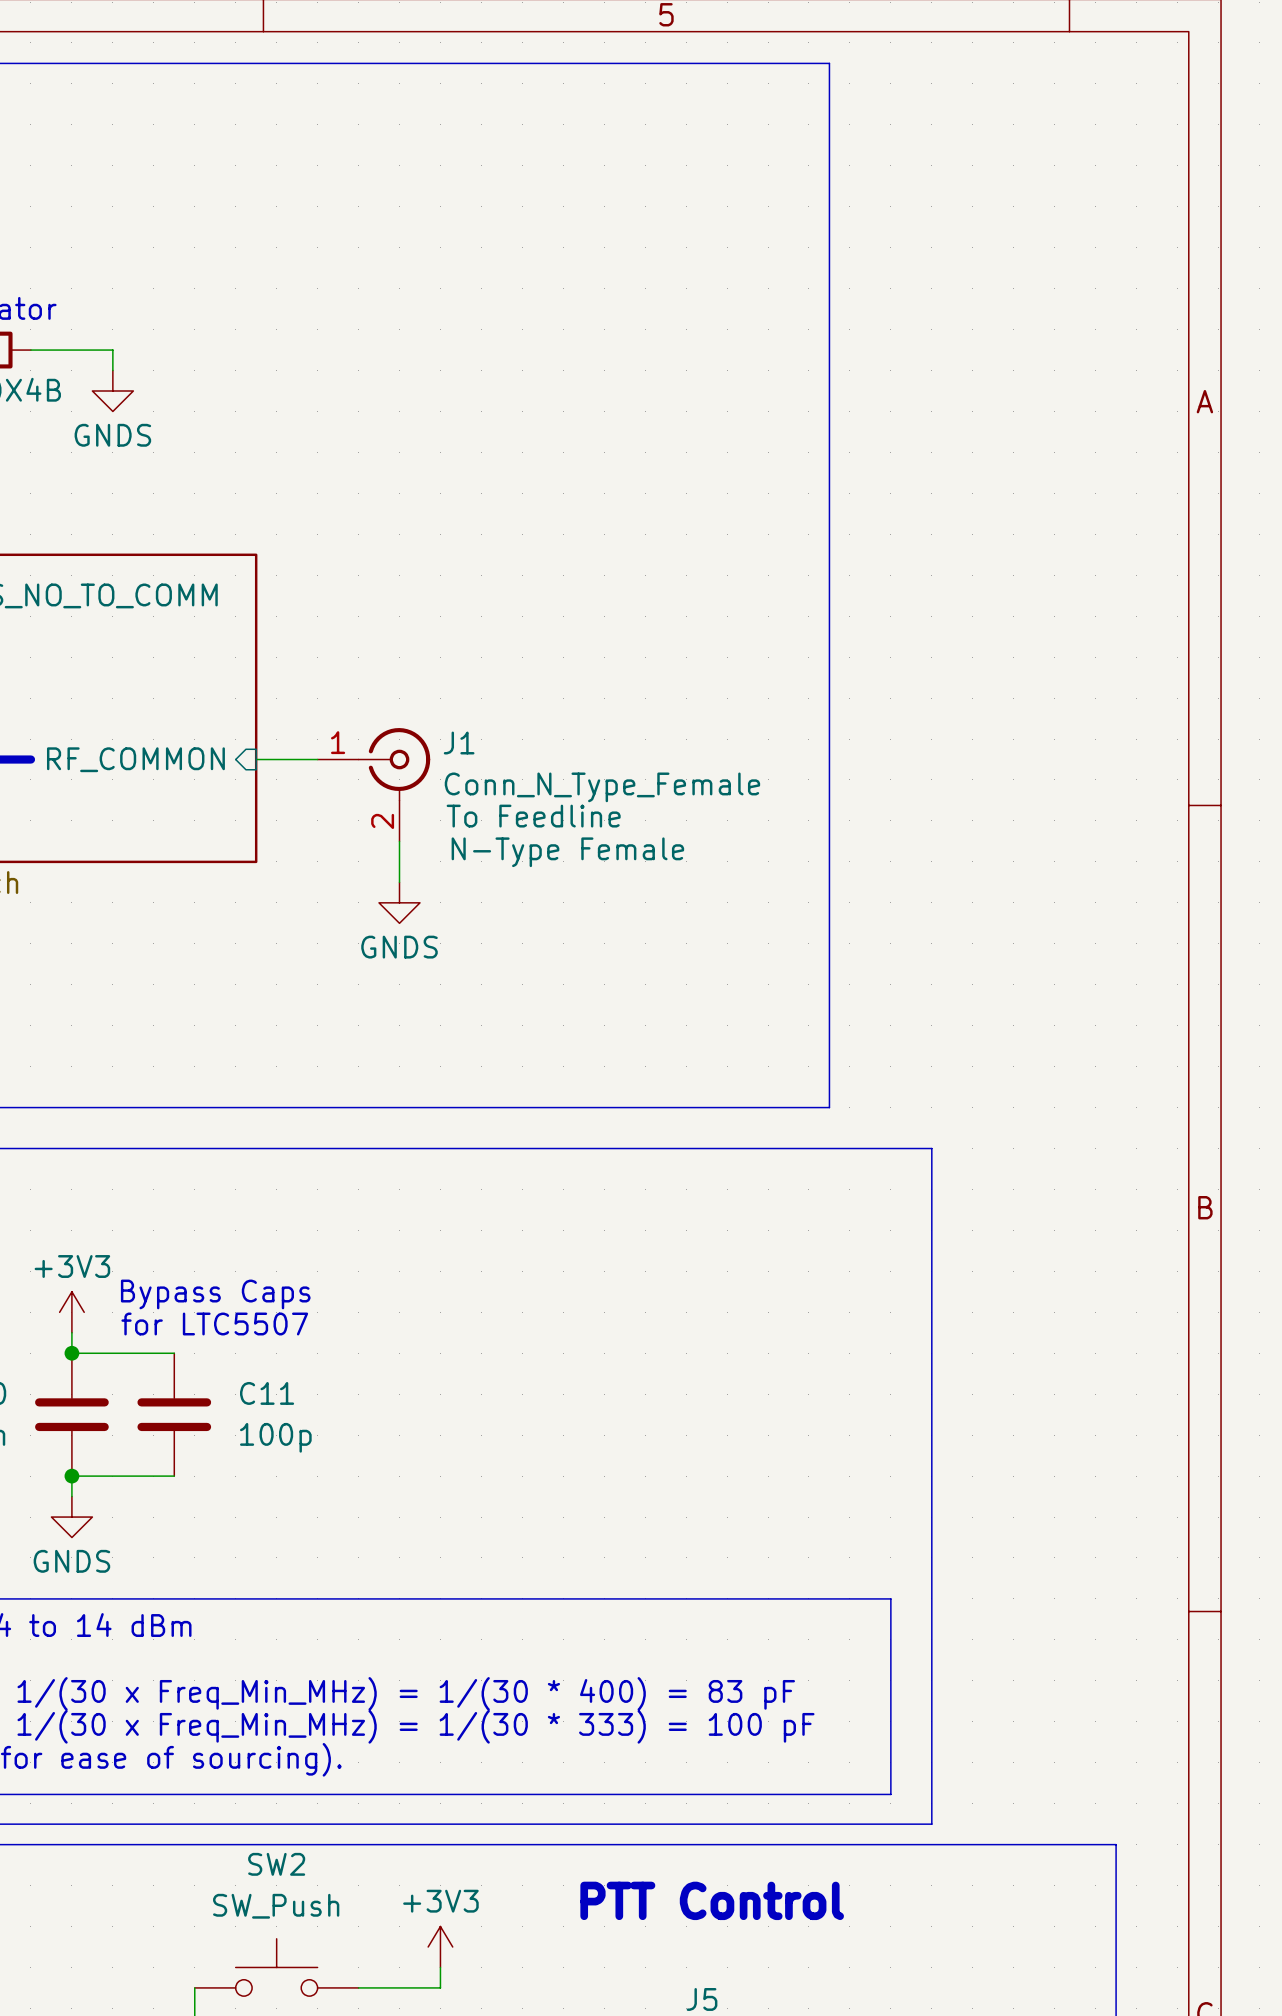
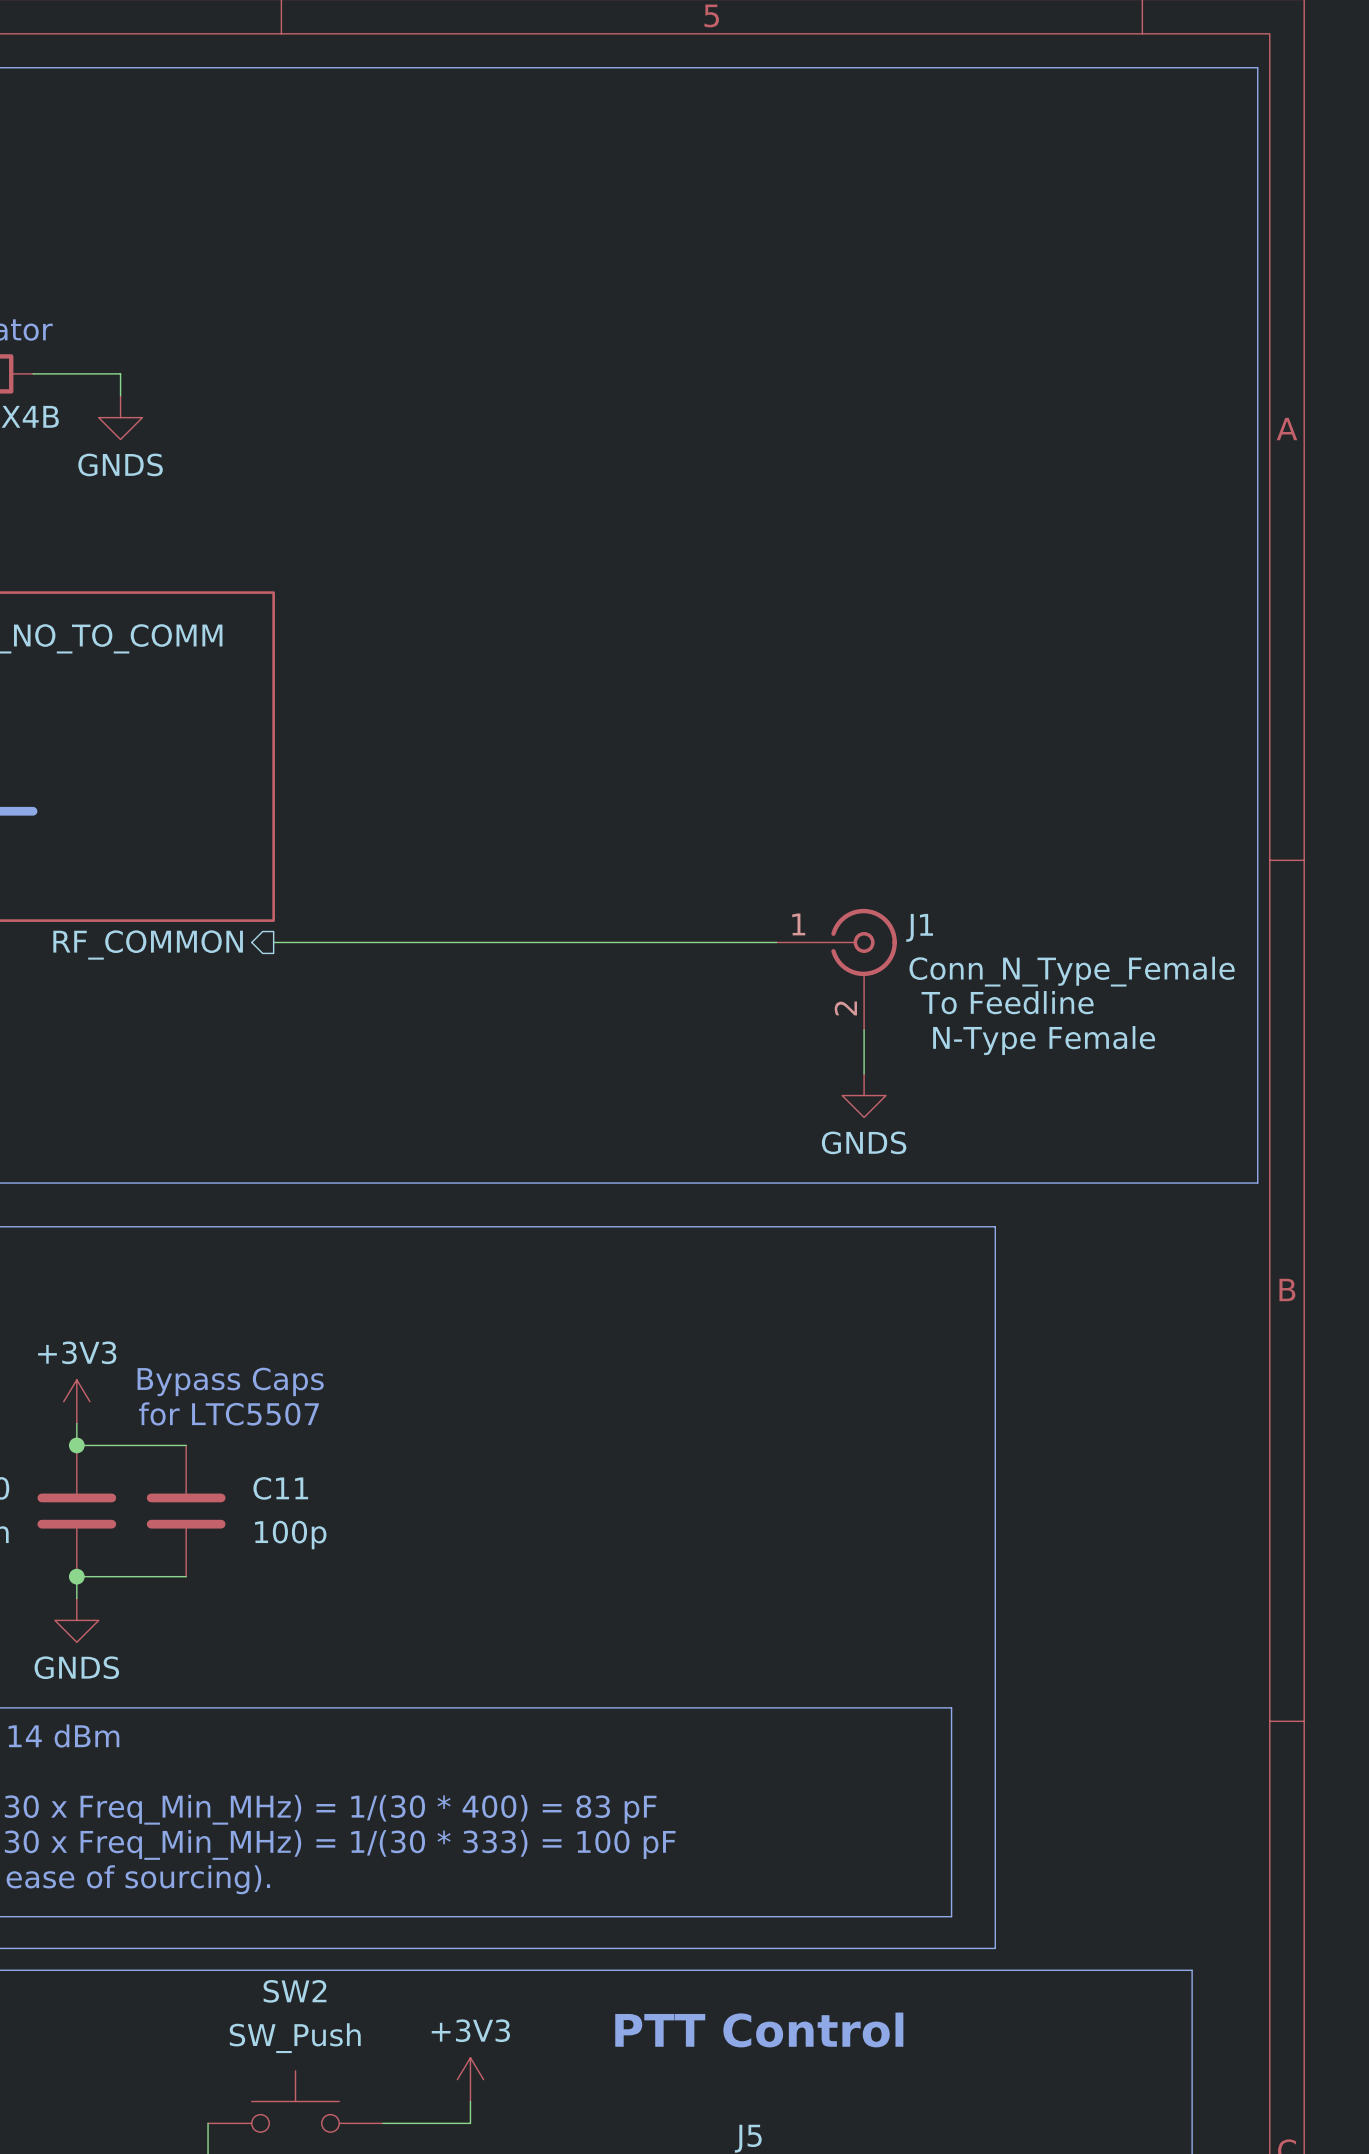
line: (829, 63) (829, 1107) -> (885, 67) (1257, 67) (1257, 1183) (885, 1183)
sheet pin position: RF_COMMON (135, 759) -> RF_COMMON (148, 945)
wire: (256, 759) (317, 759) -> none
J1 position: (373, 784) -> (836, 969)
wire: (399, 841) (399, 882) -> none
wire: none -> (273, 942) (776, 942)
power symbol: GNDS (399, 902) -> none
wire: none -> (864, 1029) (864, 1073)
power symbol: none -> GNDS (864, 1095)

